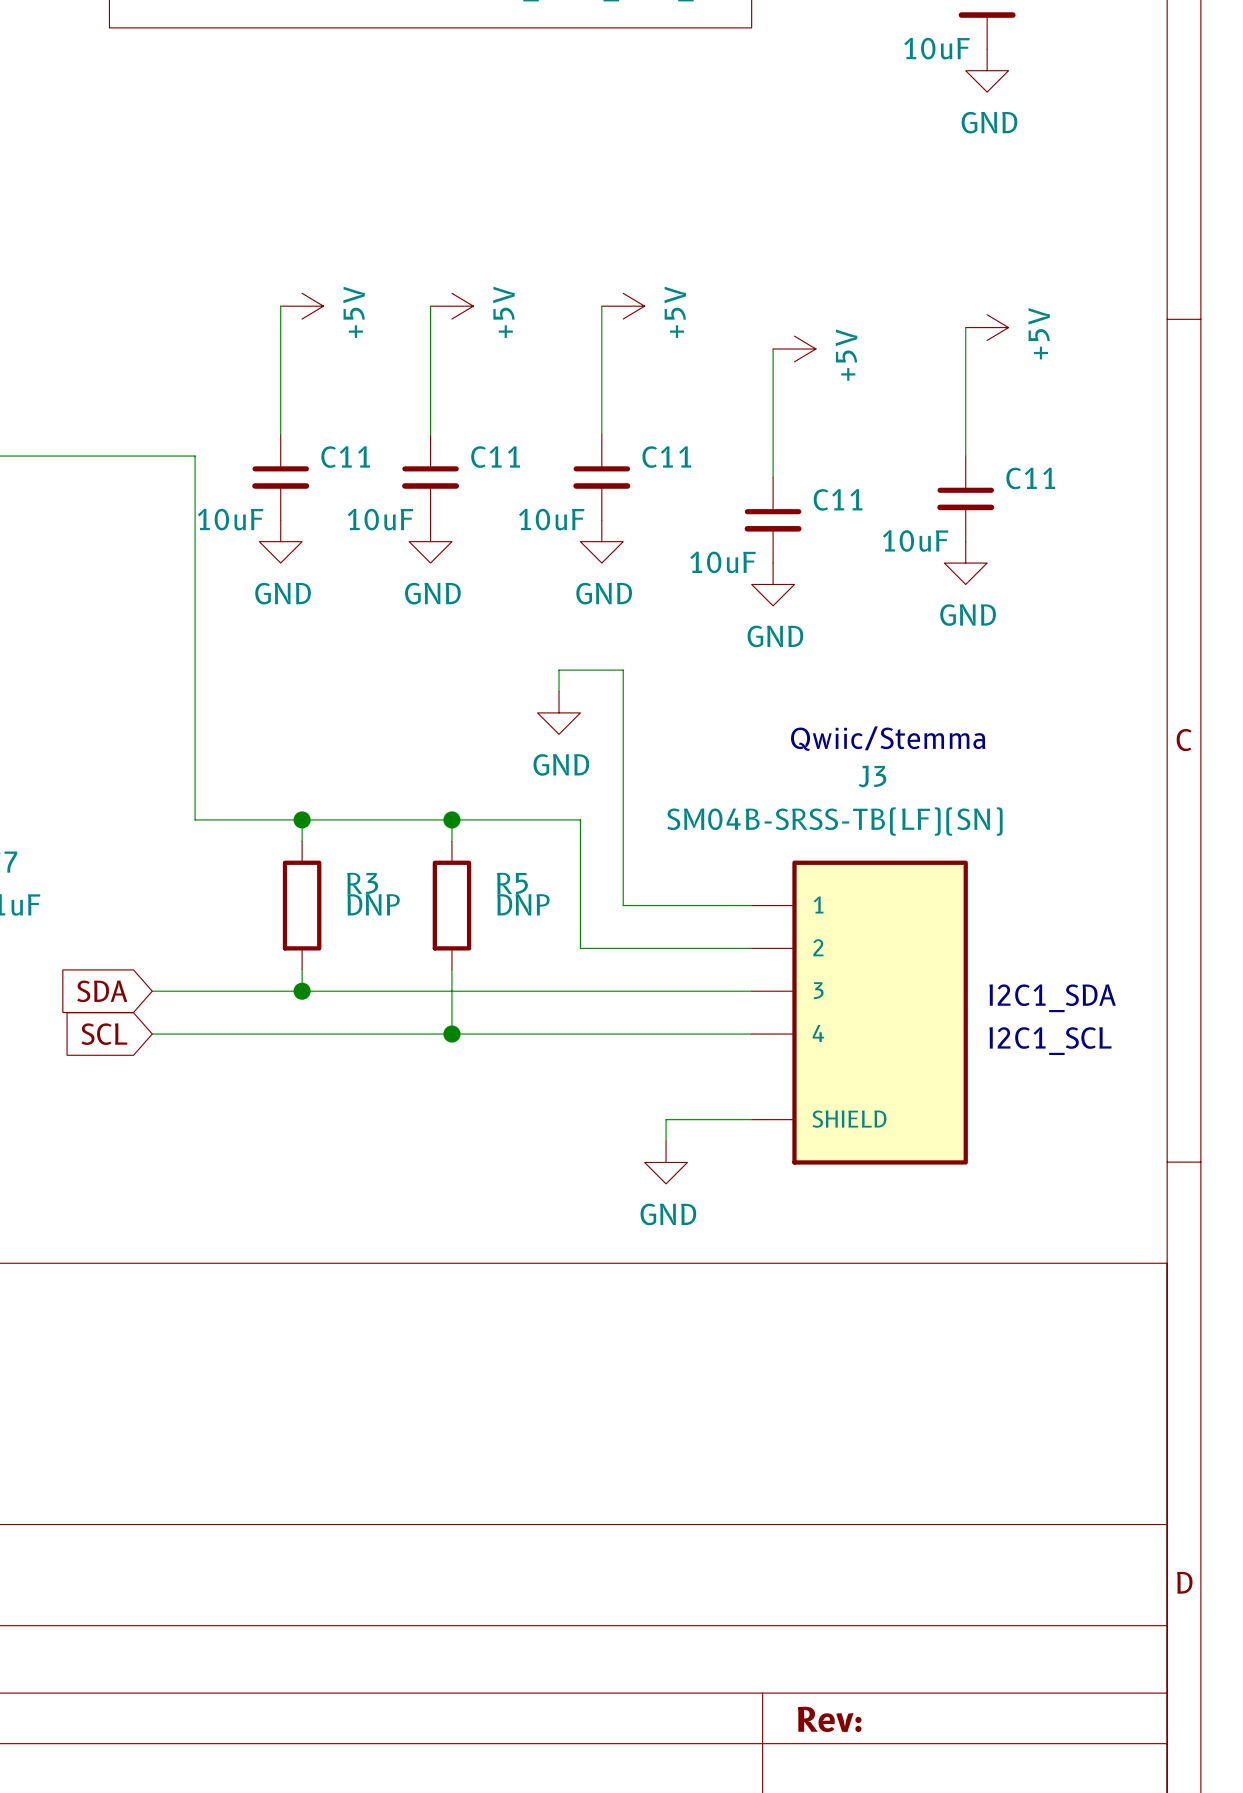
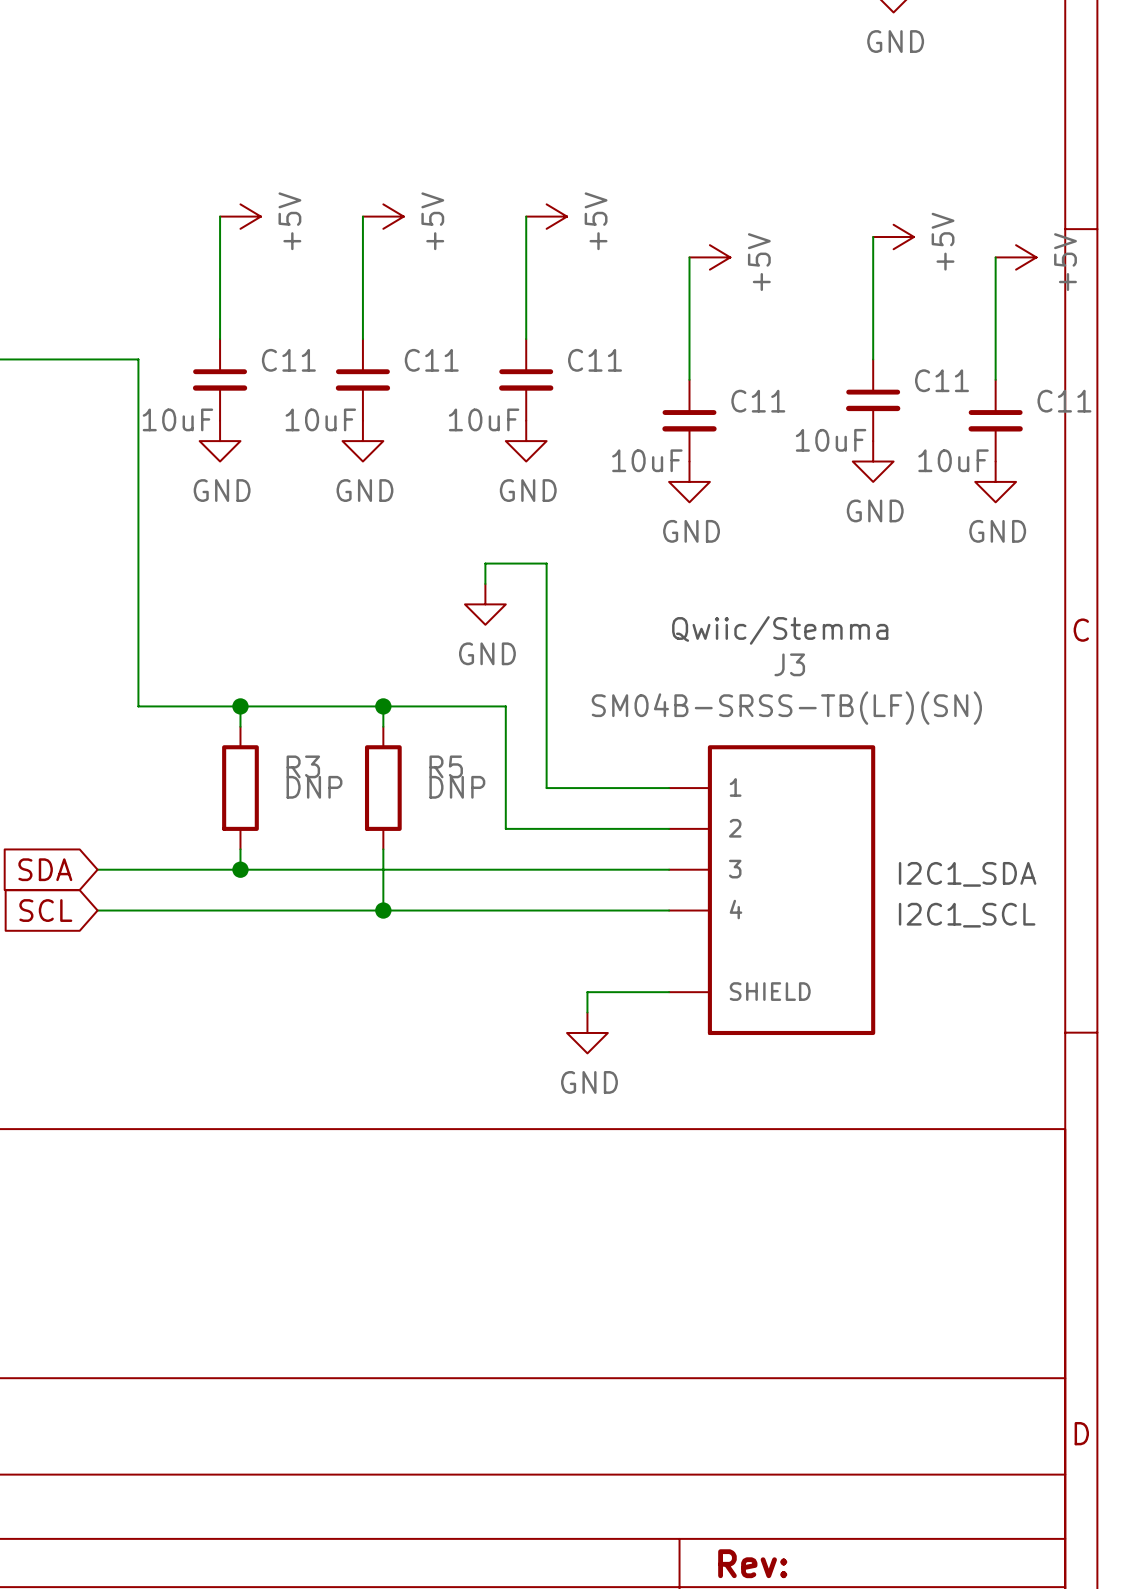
wire: none -> (995, 257) (995, 379)
power symbol: none -> +5V (1016, 257)
C11: none -> 10uF (995, 420)
power symbol: none -> GND (995, 481)

